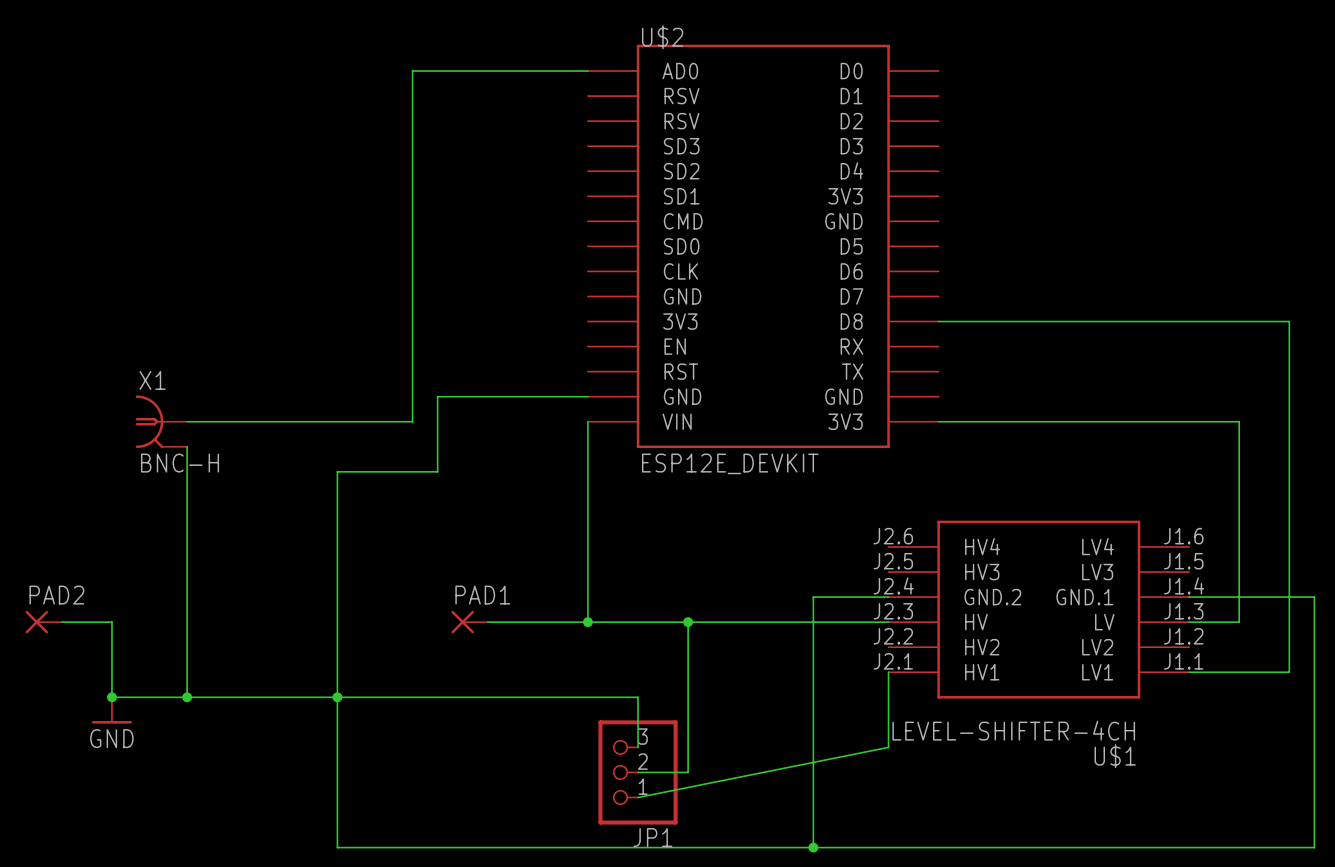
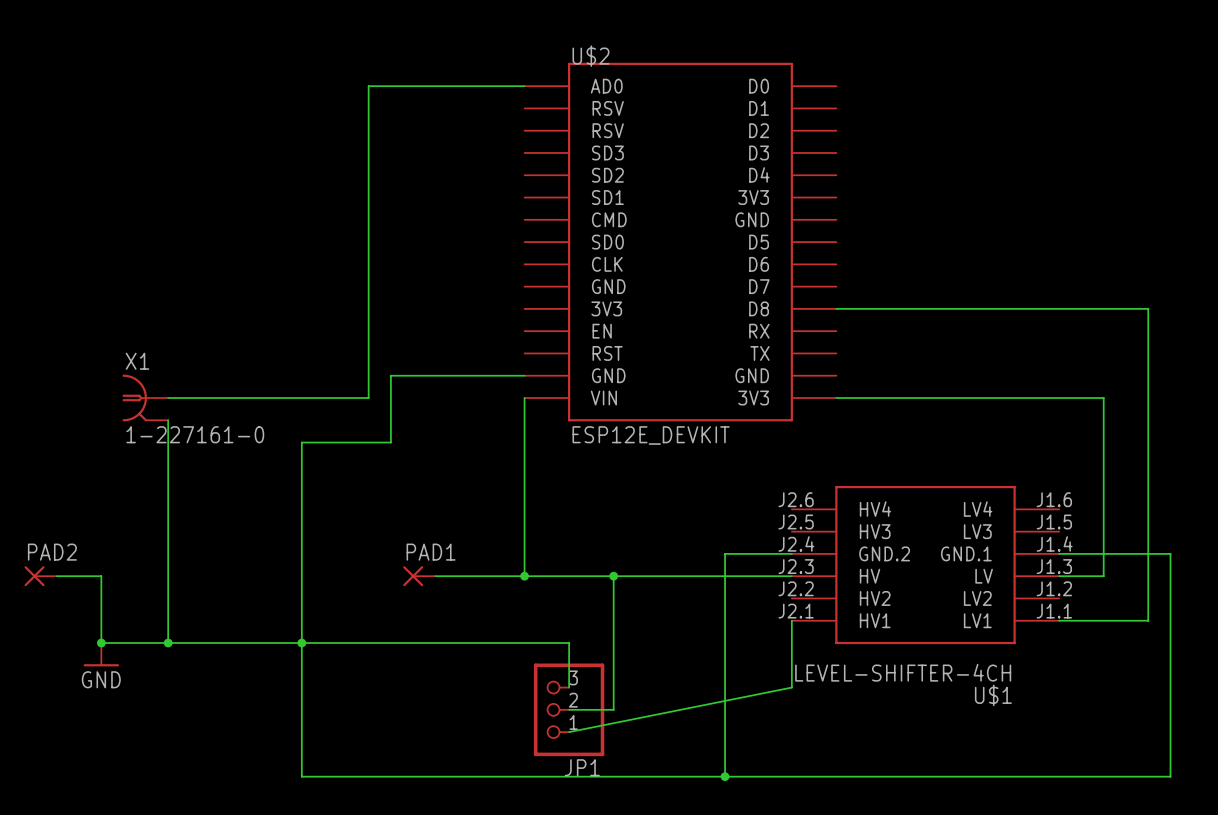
X1 value: BNC-H (180, 463) -> 1-227161-0 (195, 434)

